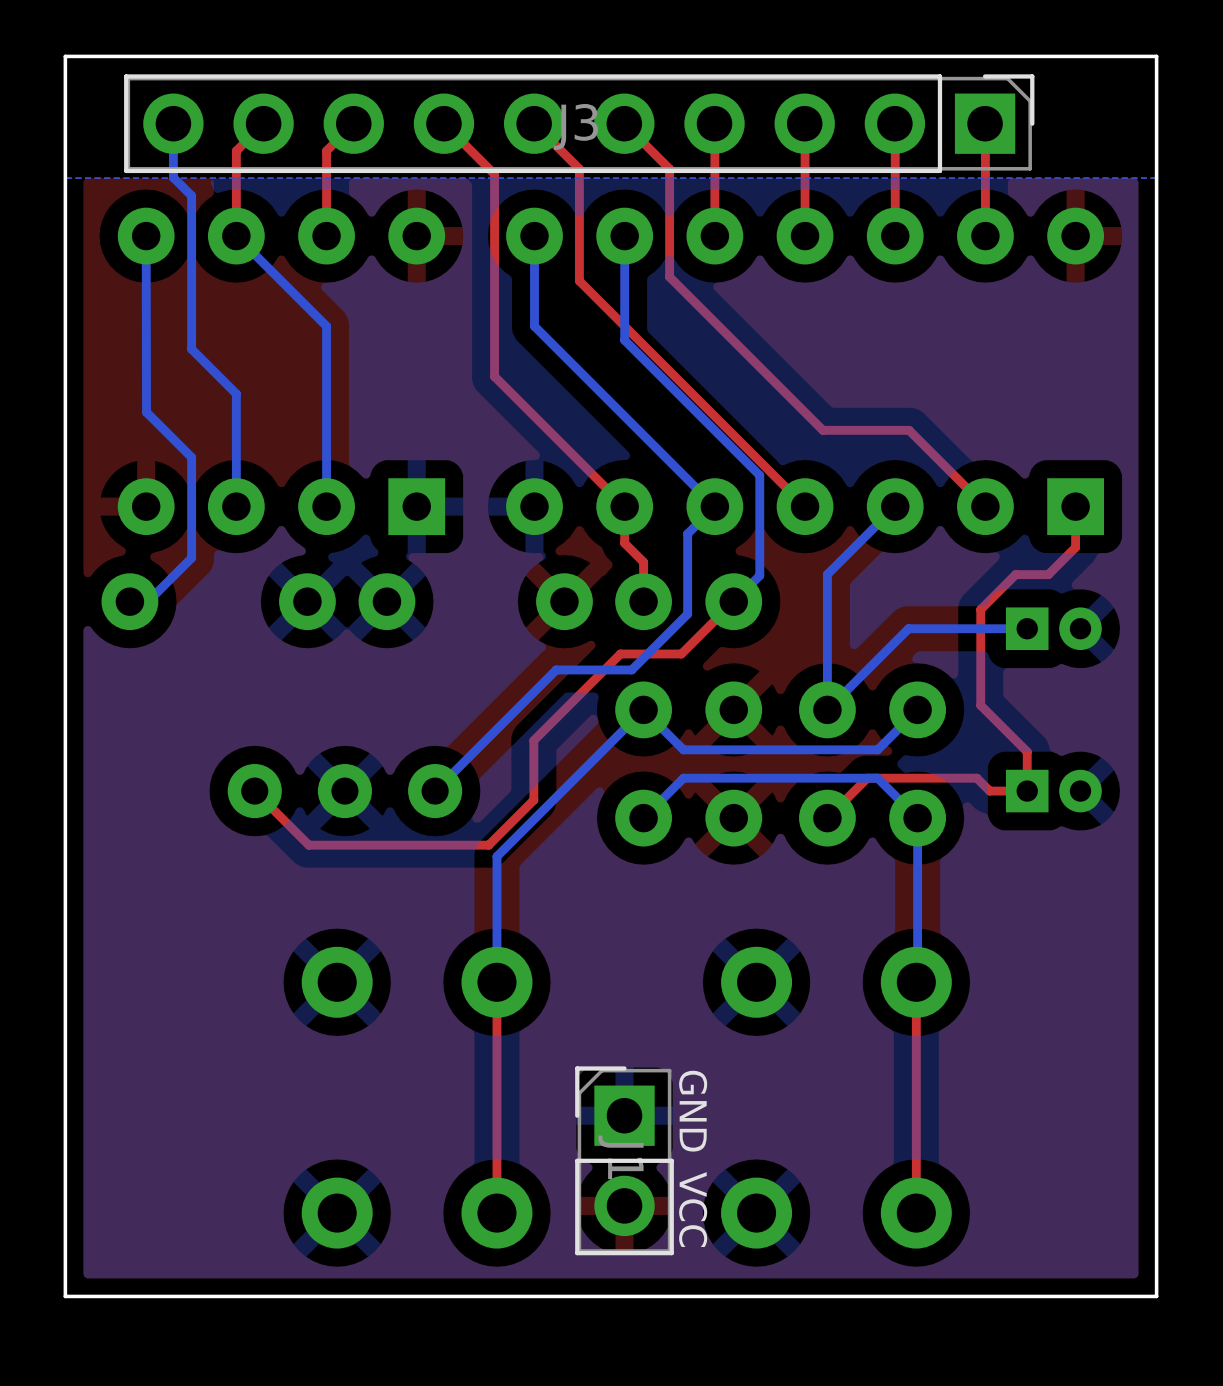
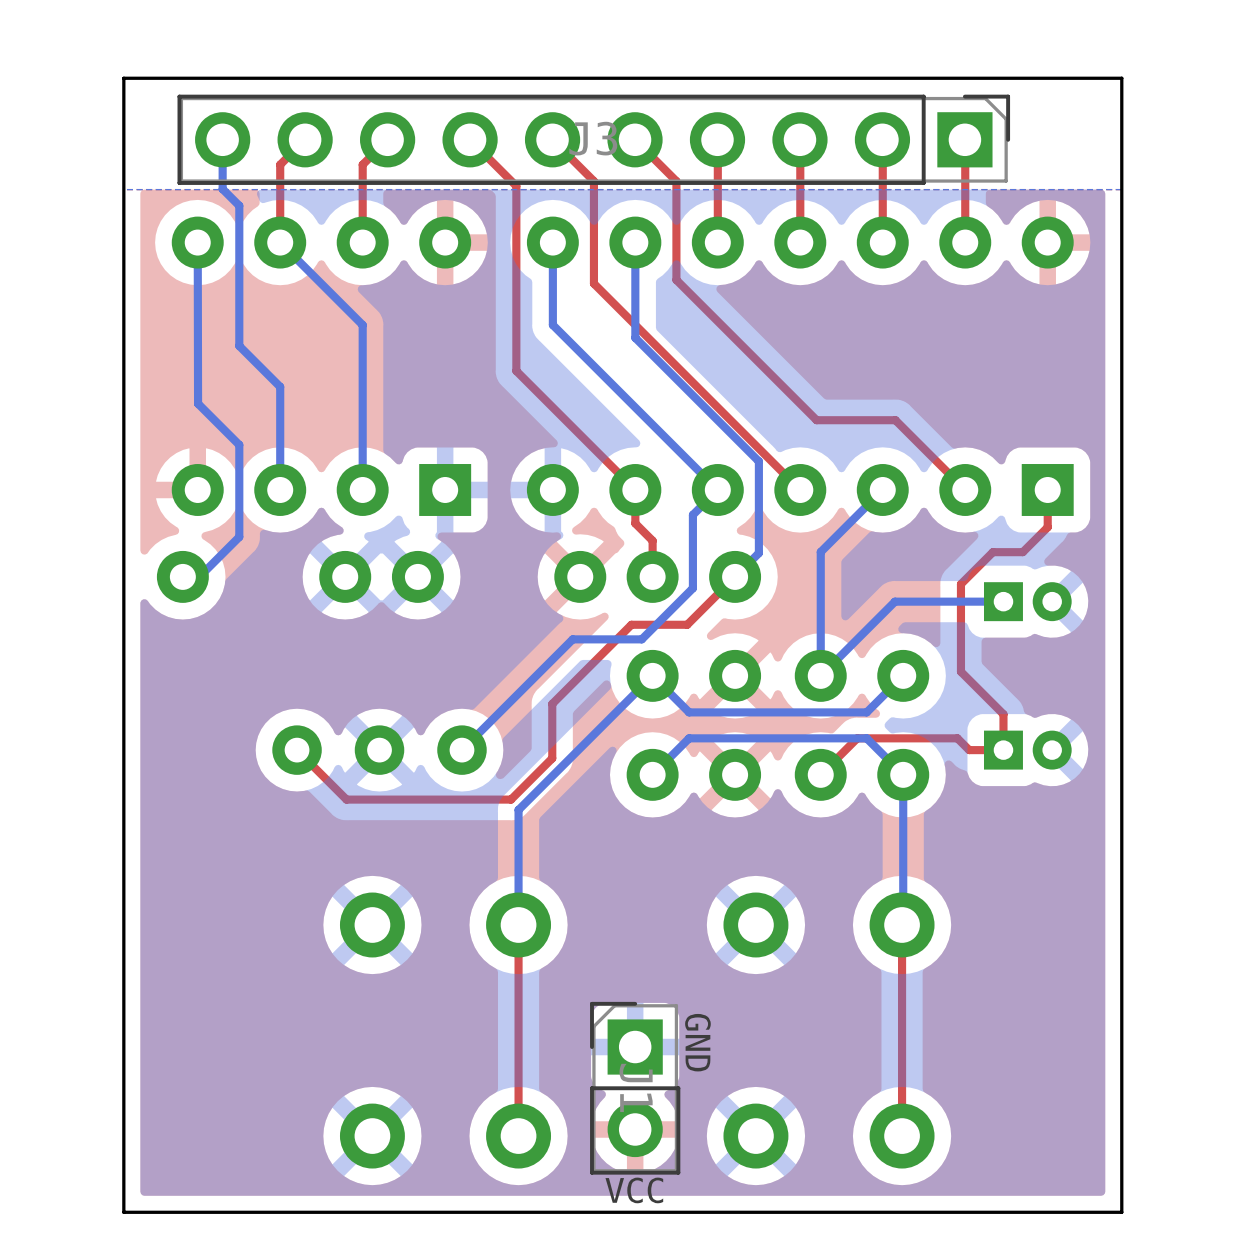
text rotation: 0° (693, 1209) -> 90° counterclockwise (634, 1190)

